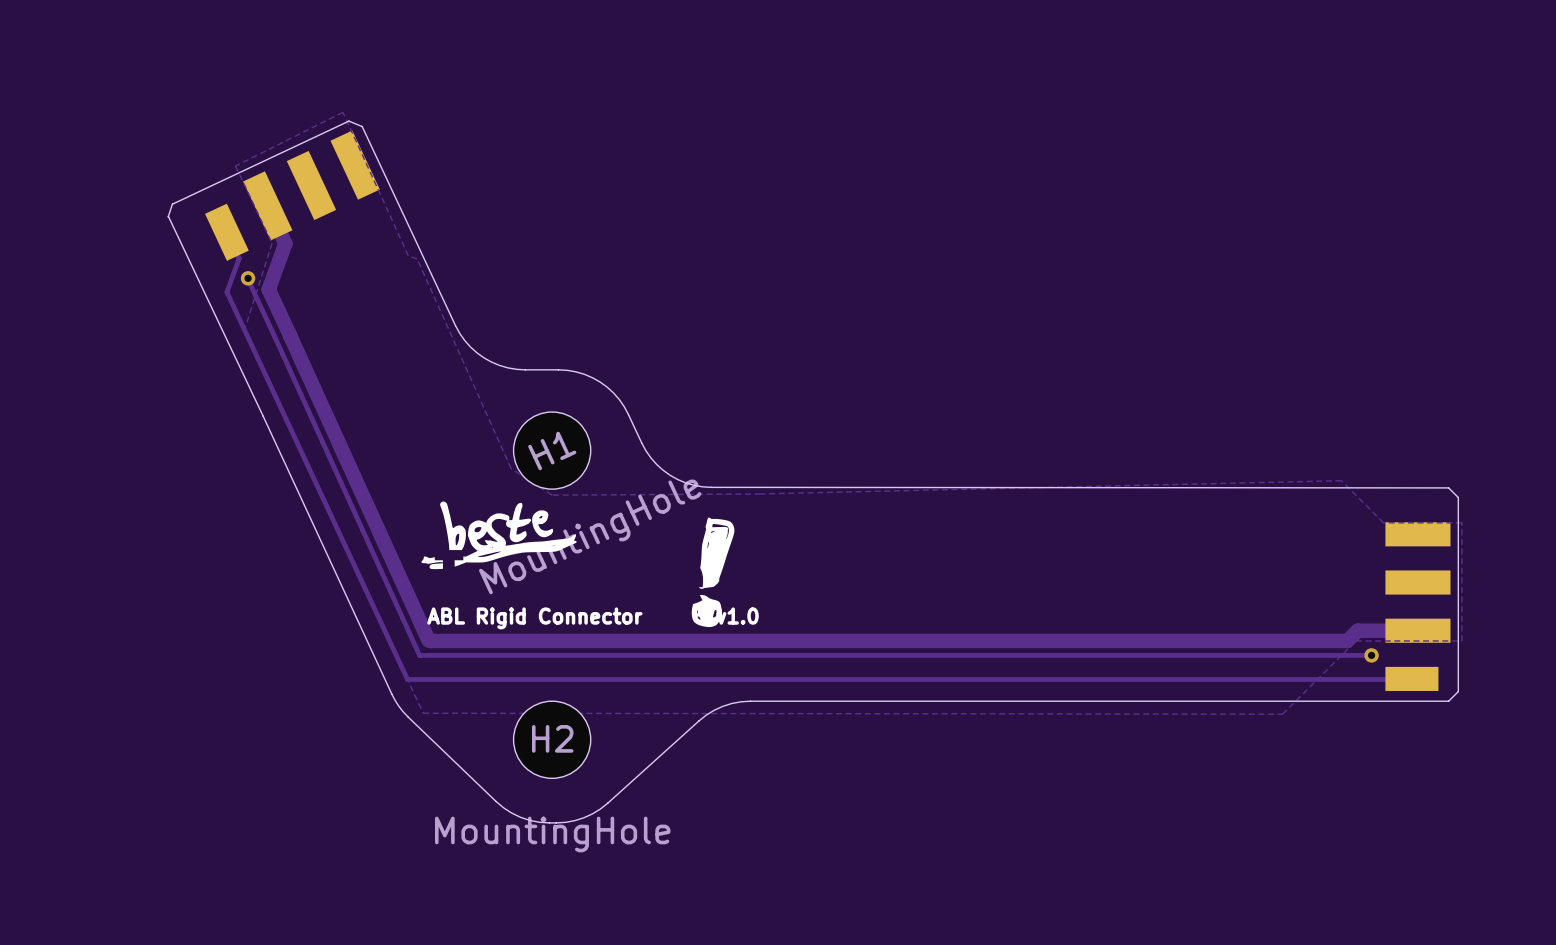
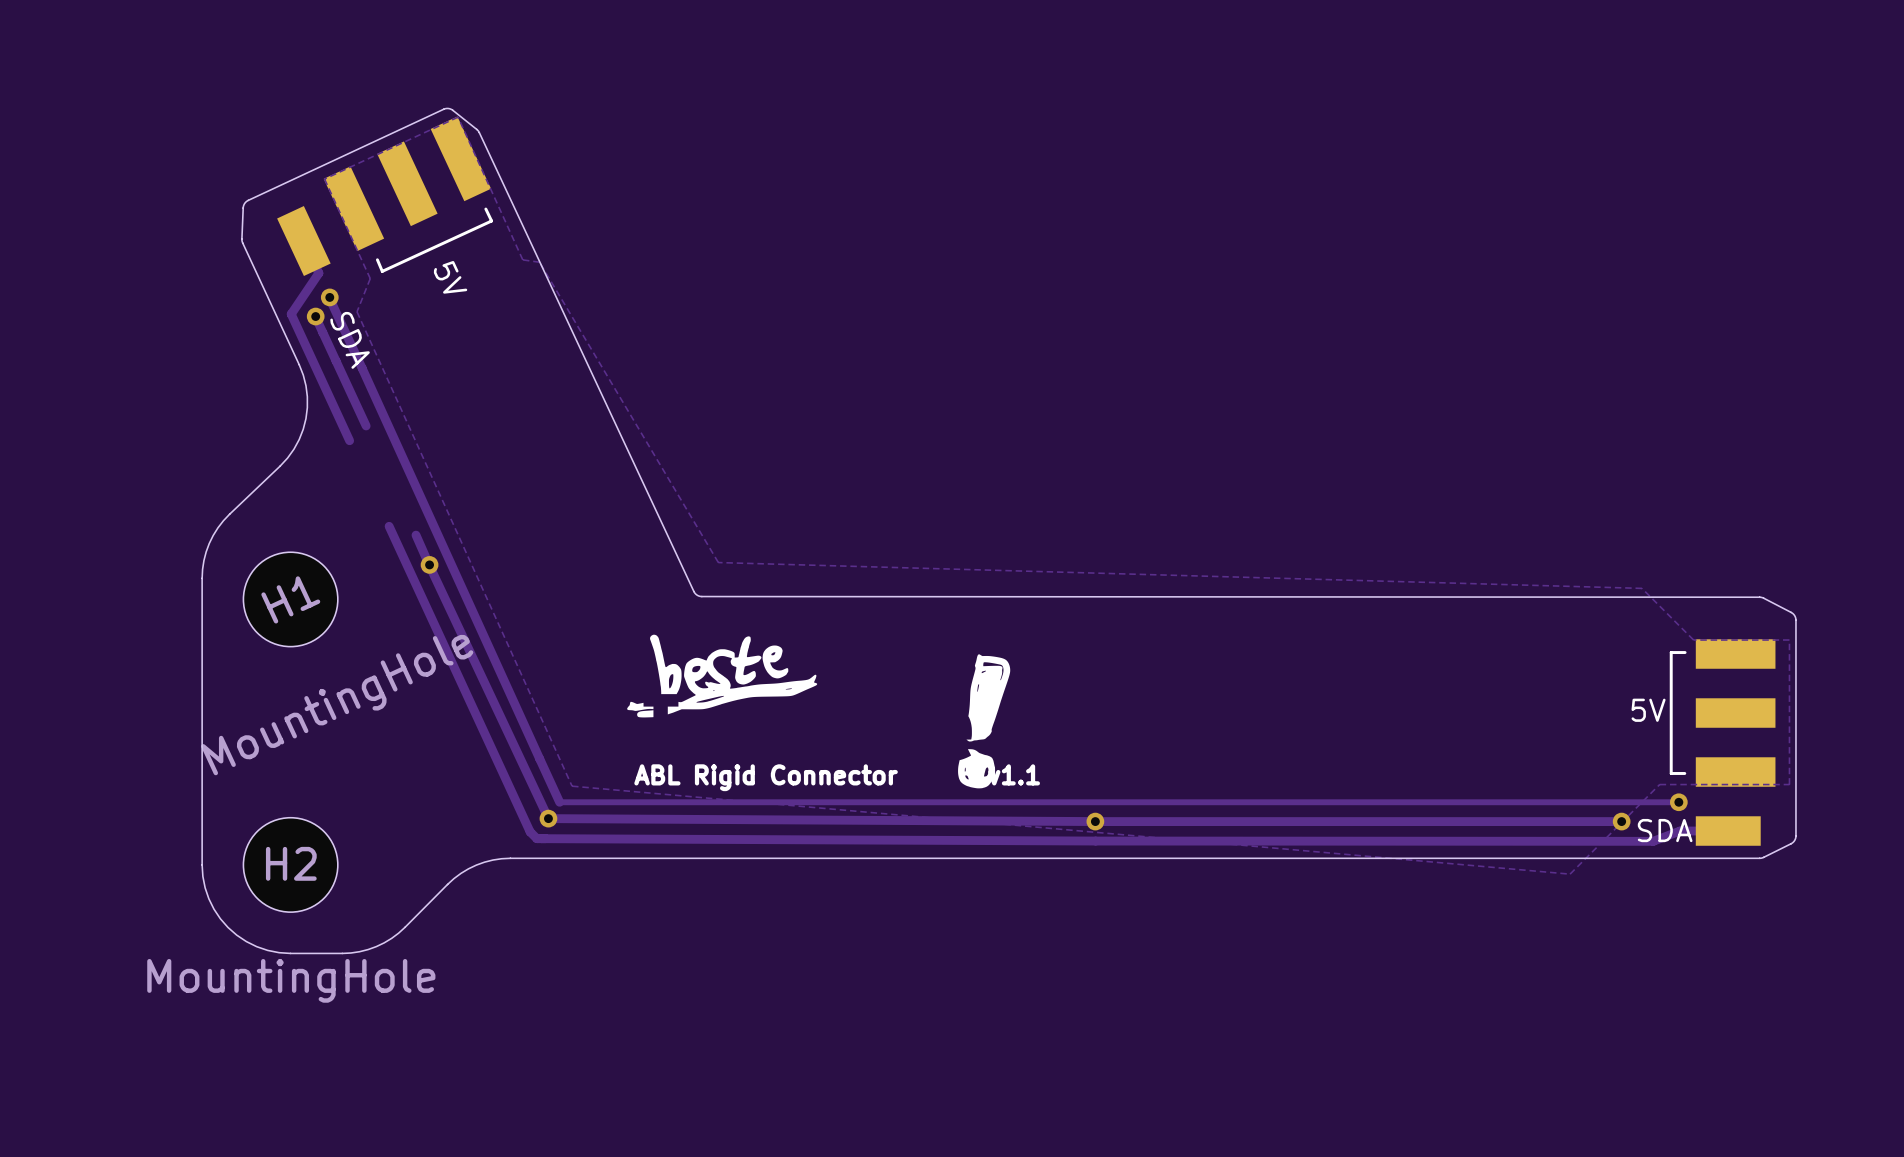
line: none -> (485, 209) (491, 220) (382, 271) (377, 259)
track: none -> (300, 233) (318, 273) (291, 314) (349, 440)
part position: (292, 195) -> (384, 196)
track: (267, 205) (285, 243) (268, 289) (290, 335) -> none
track: (224, 226) (239, 258) (226, 292) (407, 679) (1401, 679) -> none
text: none -> 5V (450, 277)
via: none -> (329, 297)
track: none -> (315, 315) (366, 425)
via: none -> (315, 316)
track: (248, 278) (419, 655) (457, 655) -> (329, 297) (559, 802)
via: (248, 278) -> none
text: none -> SDA (350, 340)
track: (290, 335) (430, 640) (1347, 640) (1357, 630) (1417, 630) -> none
track: none -> (389, 526) (530, 831) (536, 838) (545, 838)
track: none -> (416, 535) (548, 818) (1621, 821)
H1 position: (552, 450) -> (290, 599)
via: none -> (429, 564)
zone outline: (1341, 480) (760, 493) (552, 495) (511, 468) (417, 258) (408, 255) (342, 112) (235, 166) (272, 243) (244, 328) (423, 713) (1282, 714) -> (1641, 588) (718, 562) (539, 262) (522, 259) (458, 117) (324, 179) (370, 278) (357, 311) (572, 786) (1570, 874)
line: none -> (1685, 652) (1671, 652) (1671, 773) (1684, 773)
drawing position: (577, 564) -> (818, 711)
text: none -> 5V (1648, 710)
text: ABL Rigid Connector v1.0 (592, 618) -> ABL Rigid Connector v1.1 (837, 777)
via: none -> (548, 818)
via: none -> (1095, 821)
via: none -> (1621, 821)
text: none -> SDA (1665, 830)
track: none -> (1728, 831) (1680, 831) (1653, 841) (541, 838)
board edge: (750, 701) (731, 703) (706, 715) (607, 803) (583, 817) (565, 822) (539, 822) (511, 813) (496, 801) (408, 717) (395, 700) (168, 216) (172, 204) (348, 121) (362, 126) (455, 325) (470, 346) (491, 362) (507, 367) (567, 370) (584, 374) (600, 381) (613, 393) (624, 406) (645, 450) (656, 464) (677, 479) (694, 485) (711, 487) (1448, 487) (1458, 497) (1458, 691) (1448, 701) (1437, 701) -> (918, 858) (501, 858) (484, 862) (461, 873) (398, 933) (384, 942) (359, 951) (342, 953) (279, 952) (256, 946) (236, 935) (228, 927) (213, 909) (205, 887) (202, 876) (202, 569) (209, 543) (217, 527) (280, 466) (293, 449) (303, 429) (307, 407) (305, 385) (299, 364) (242, 242) (243, 208) (245, 202) (444, 108) (452, 109) (476, 129) (693, 591) (699, 596) (1762, 597) (1792, 612) (1795, 619) (1795, 835) (1791, 843) (1759, 858)
H2 position: (552, 739) -> (290, 864)

